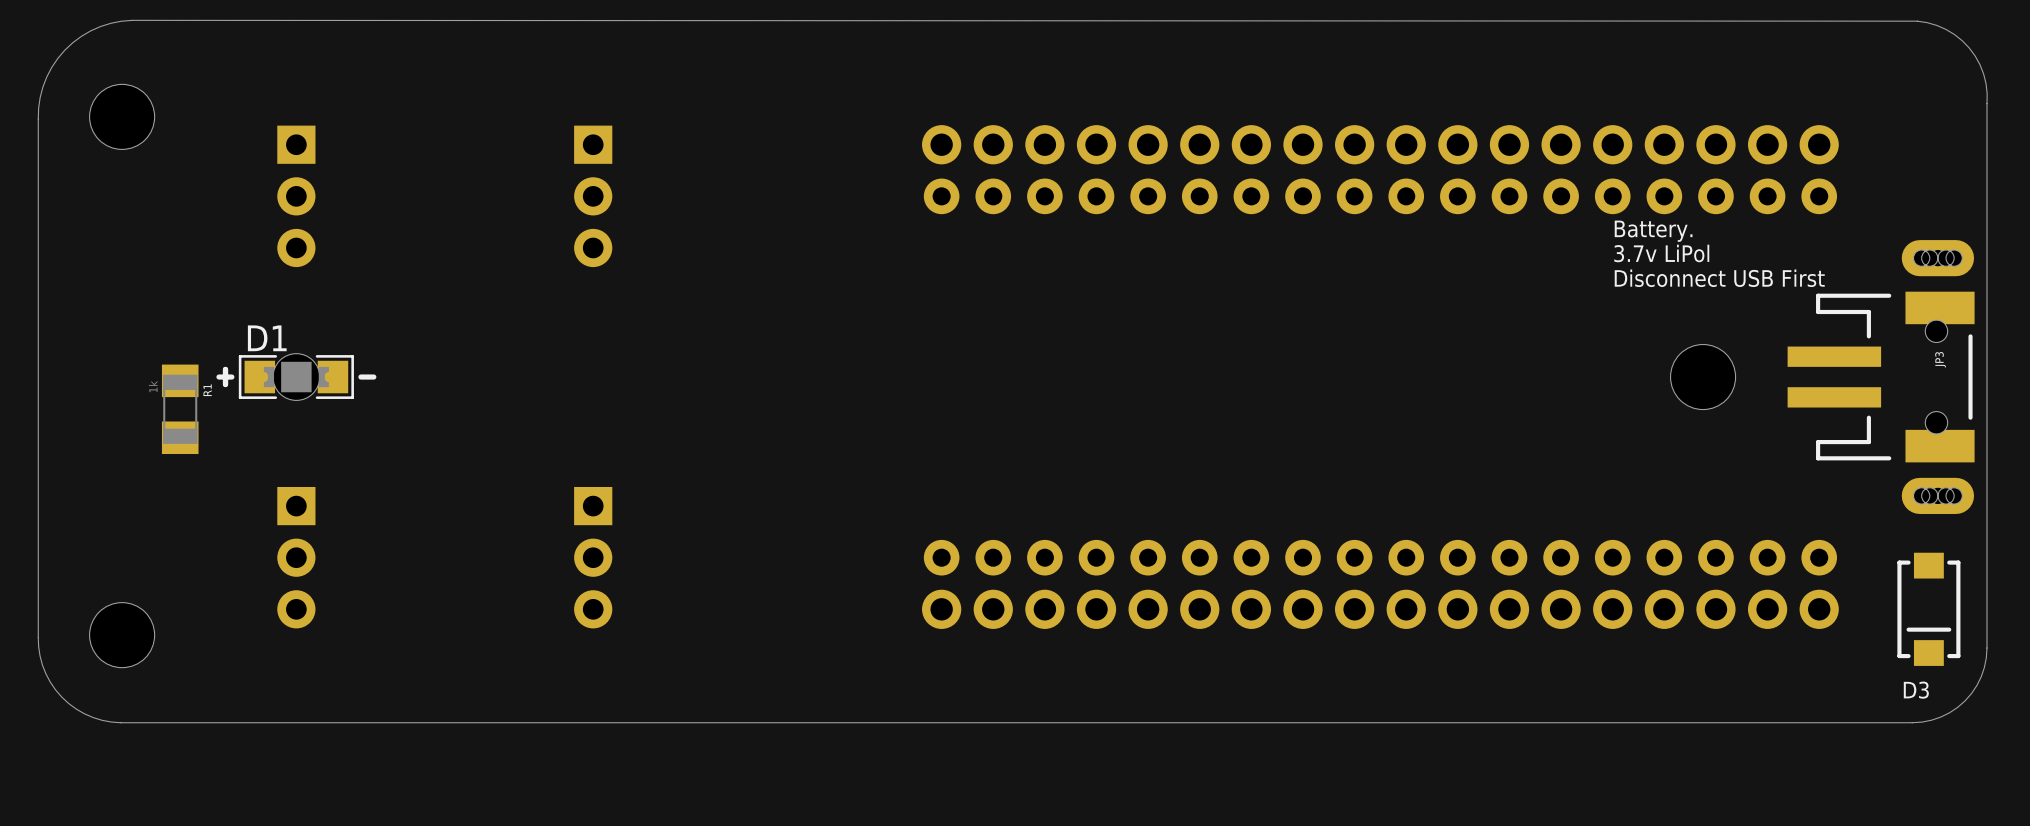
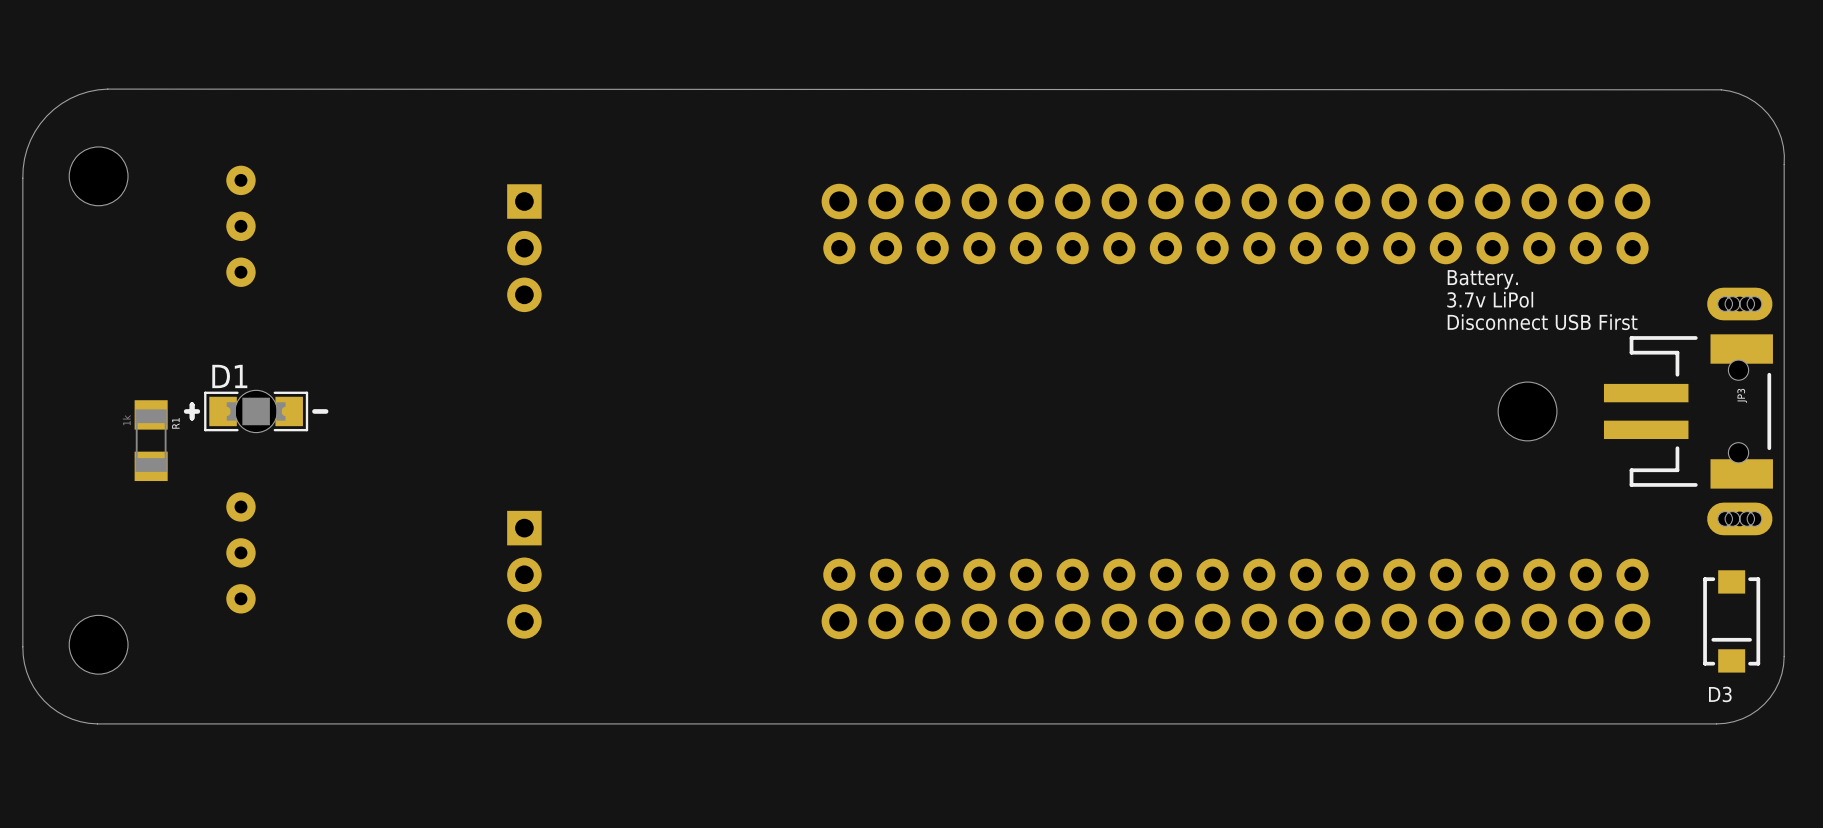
part: none -> (240, 226)
part: (296, 196) -> none
part: none -> (240, 552)
part: (296, 557) -> none

